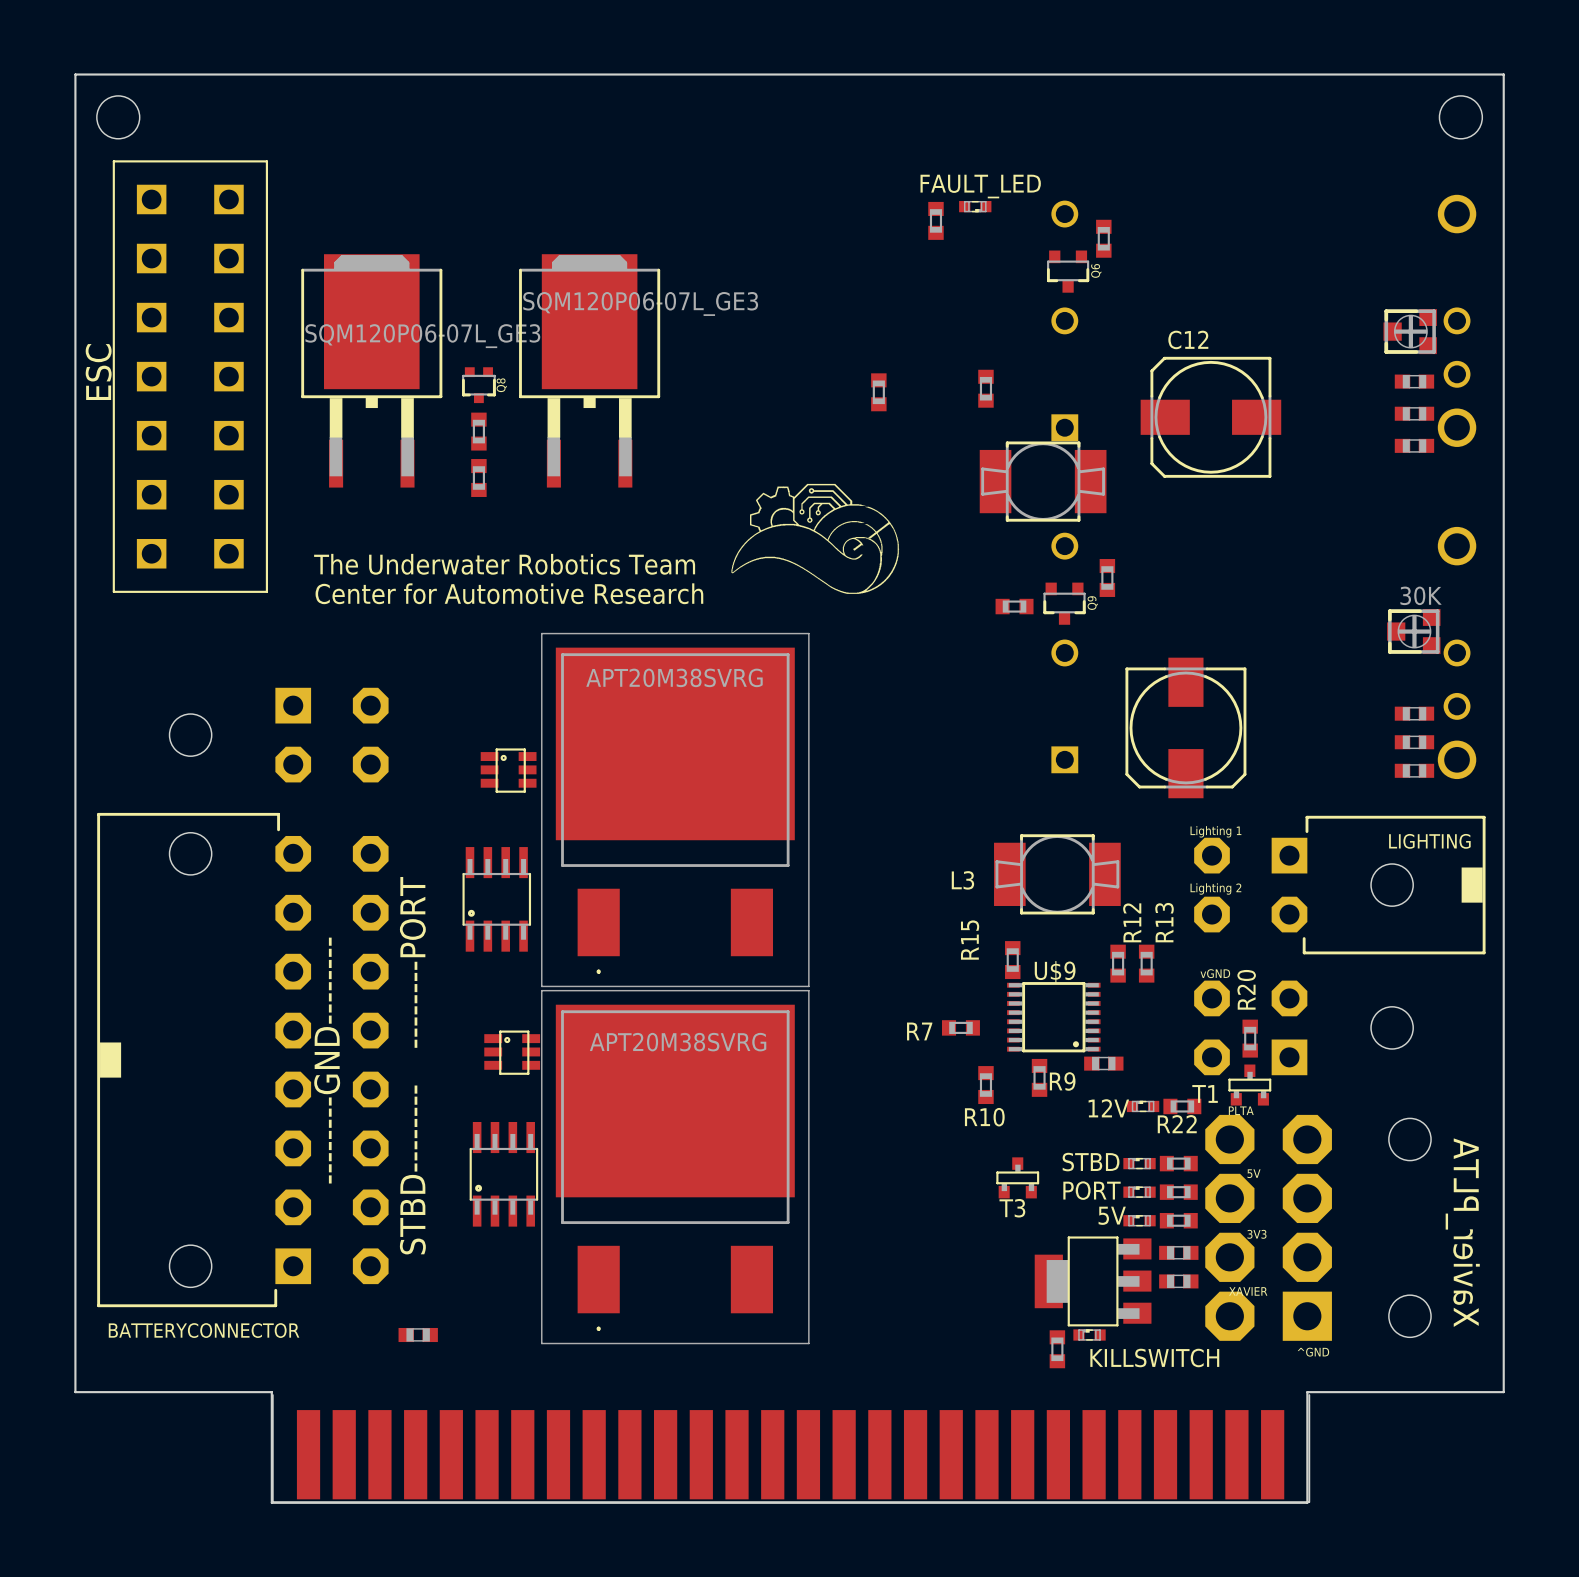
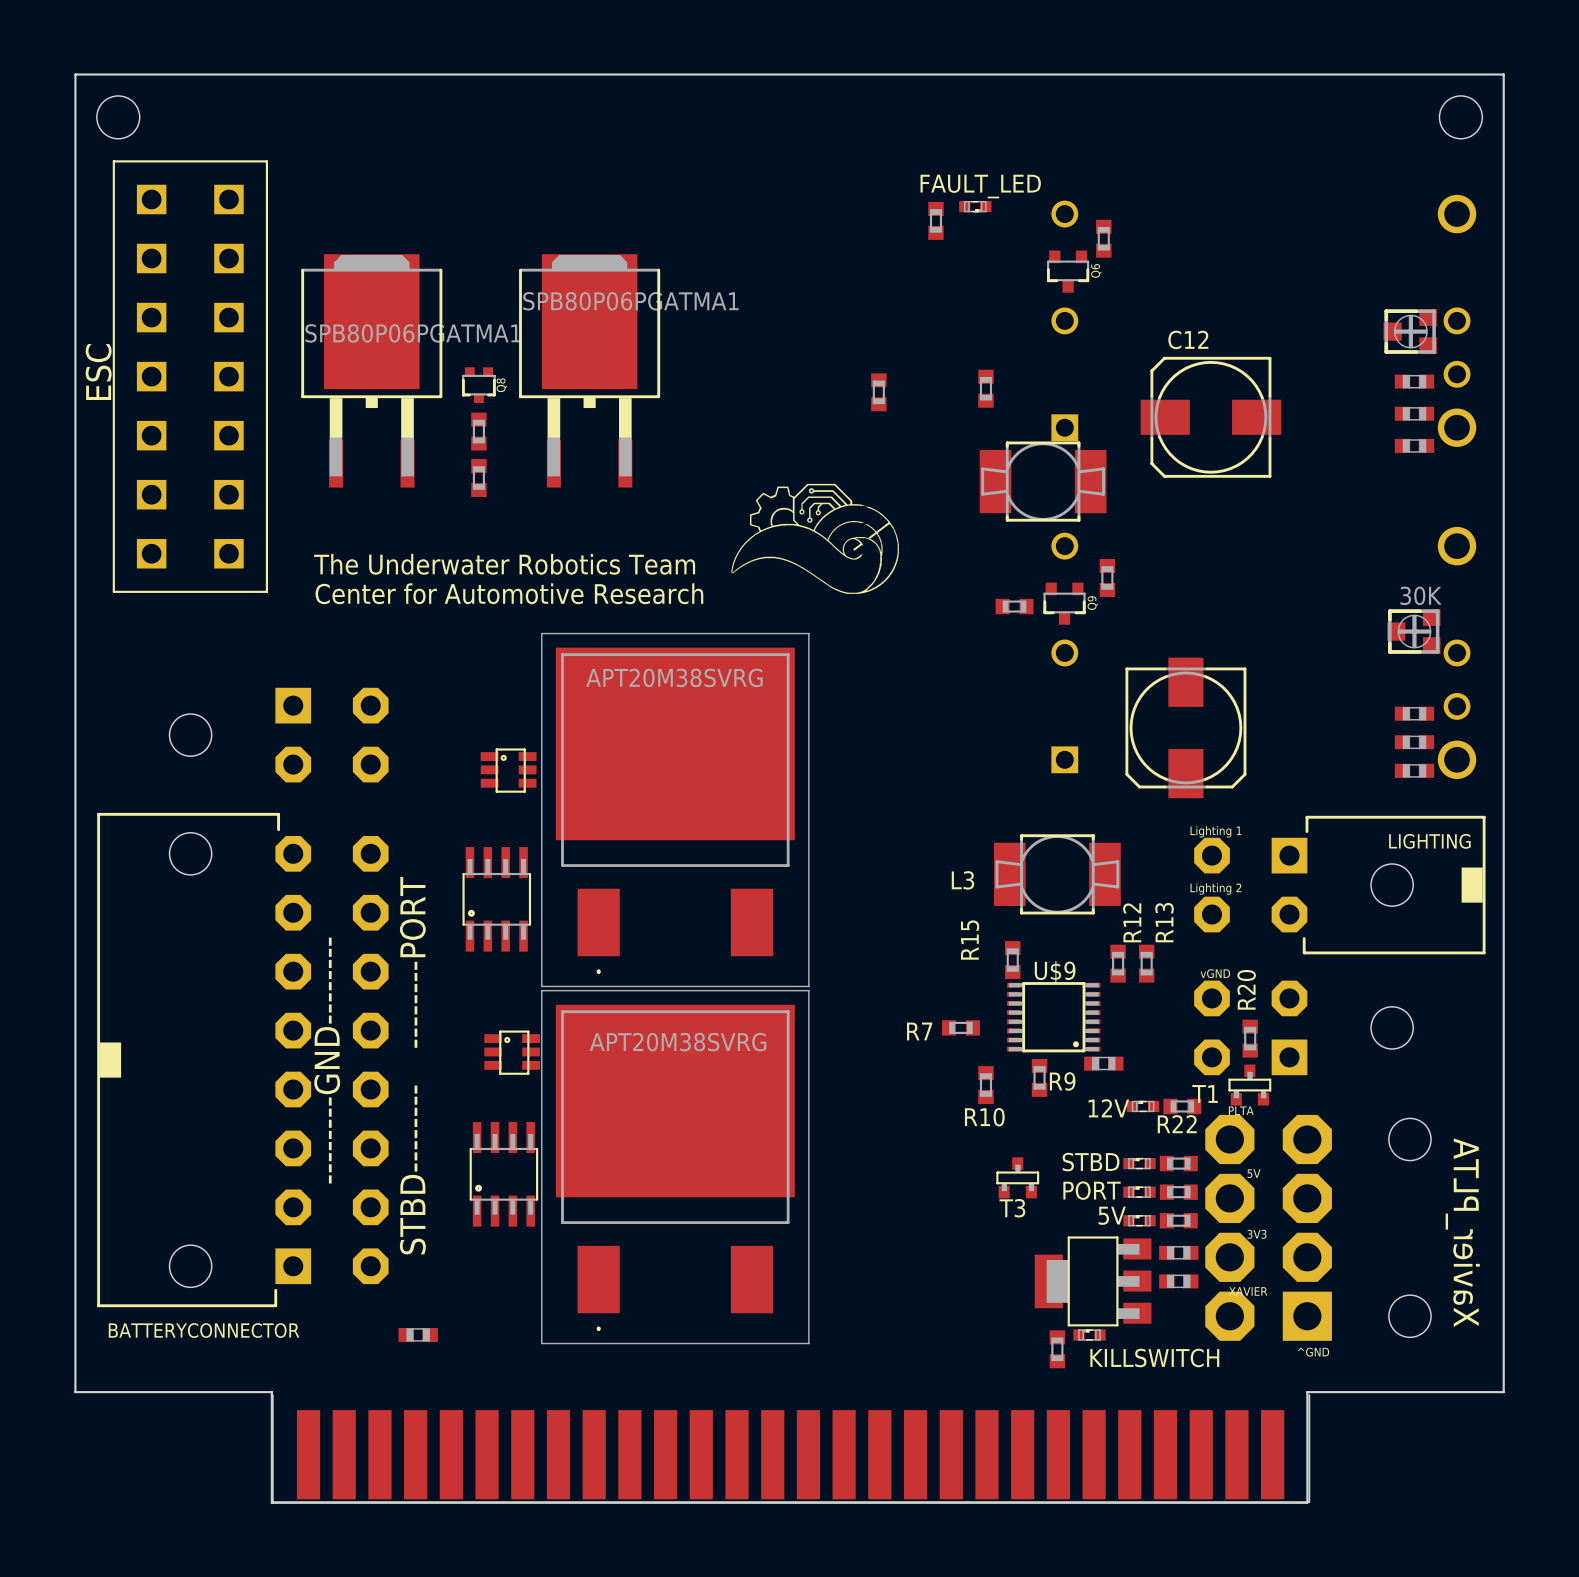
part value: SQM120P06-07L_GE3 (640, 303) -> SPB80P06PGATMA1 (630, 301)
part value: SQM120P06-07L_GE3 (422, 336) -> SPB80P06PGATMA1 (413, 333)

